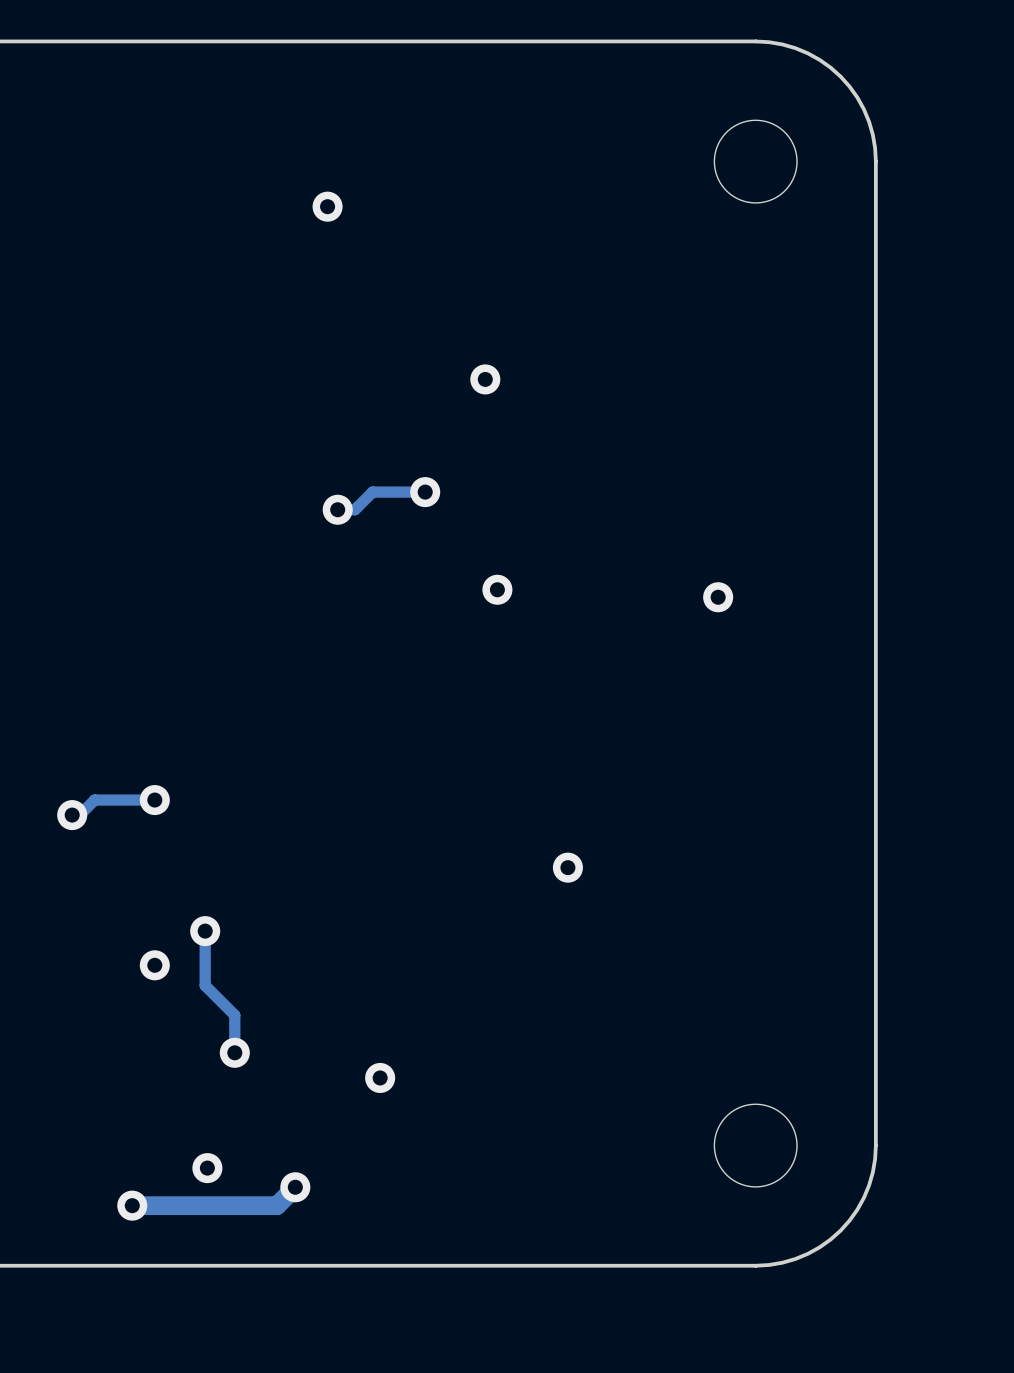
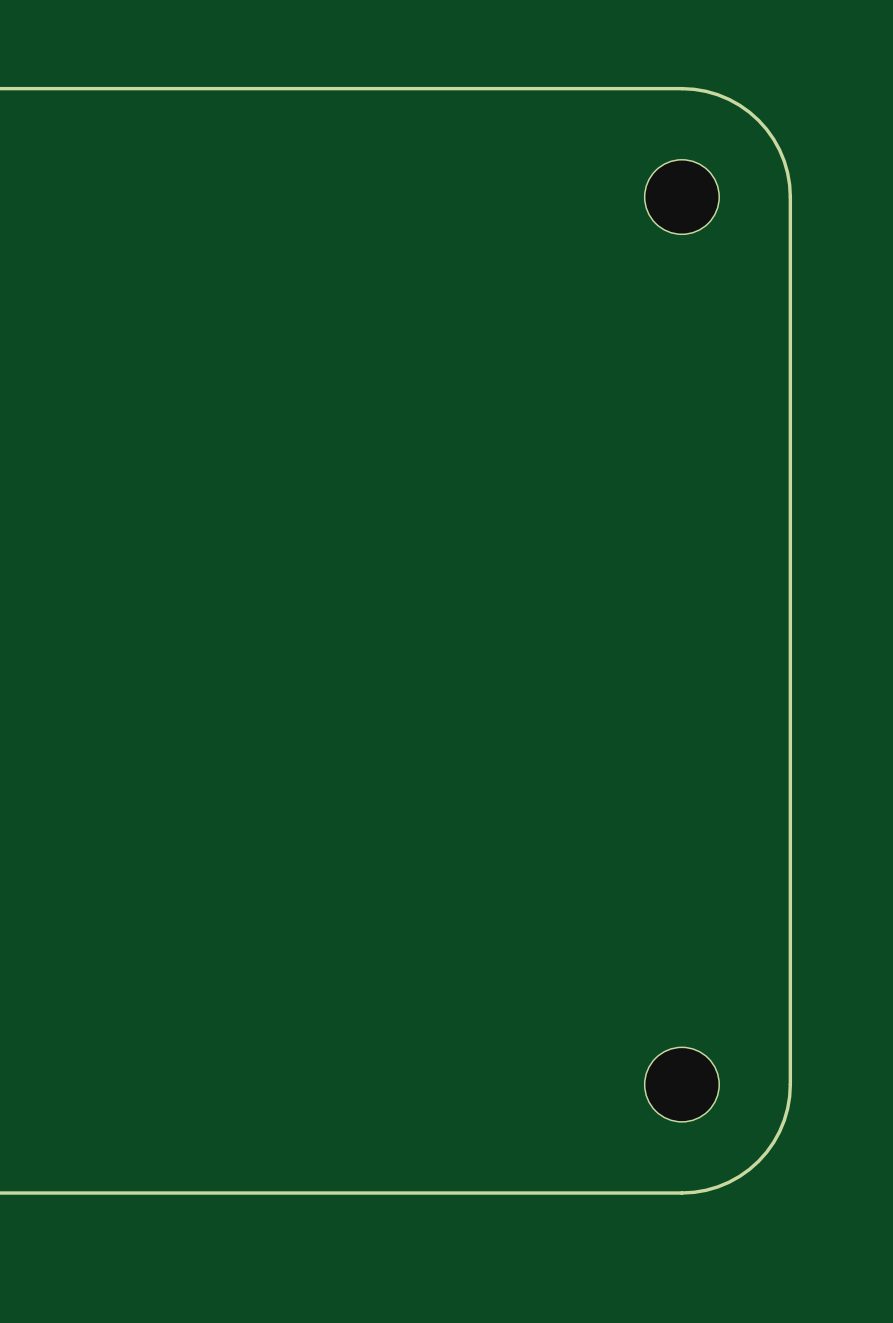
via: (327, 206) -> none
via: (485, 379) -> none
track: (425, 492) (372, 492) (354, 509) (337, 509) -> none
via: (425, 492) -> none
via: (337, 509) -> none
via: (497, 589) -> none
via: (718, 597) -> none
track: (154, 800) (94, 800) (79, 815) (72, 815) -> none
via: (154, 800) -> none
via: (72, 815) -> none
via: (567, 867) -> none
track: (205, 931) (205, 985) (234, 1015) (234, 1052) -> none
via: (205, 931) -> none
via: (154, 965) -> none
via: (234, 1052) -> none
via: (380, 1077) -> none
via: (207, 1168) -> none
track: (295, 1187) (276, 1205) (132, 1205) -> none
via: (295, 1187) -> none
via: (132, 1205) -> none

